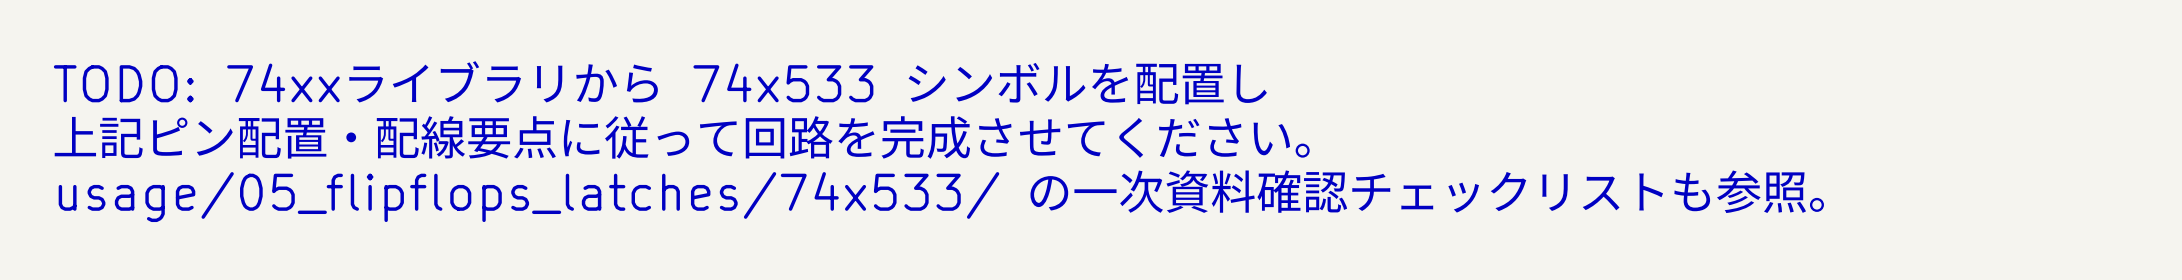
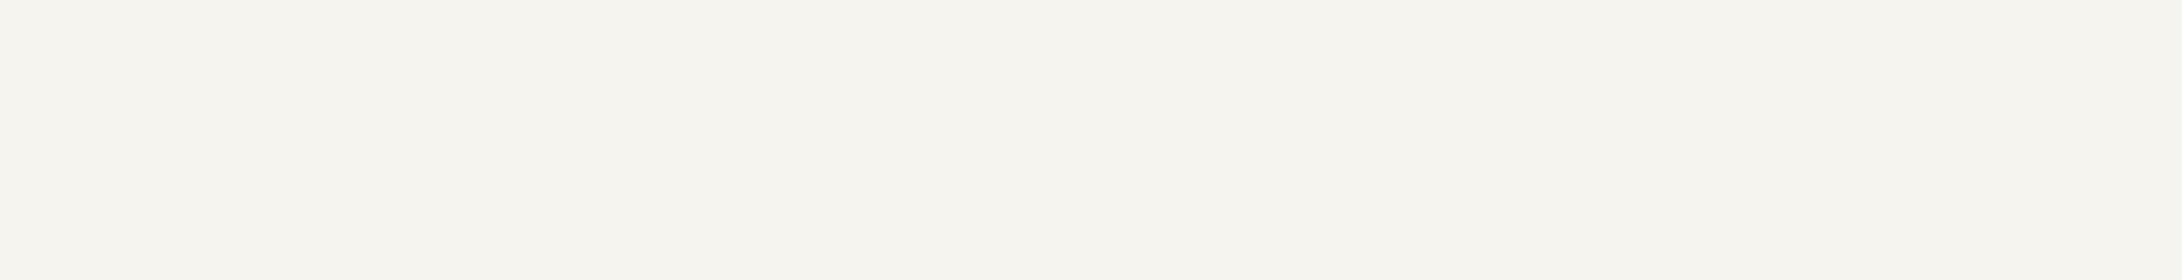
text: TODO: 74xxライブラリから 74x533 シンボルを配置し (661, 82) -> none
text: 上記ピン配置・配線要点に従って回路を完成させてください。 (682, 137) -> none
text: usage/05_flipflops_latches/74x533/ の一次資料確認チェックリストも参照。 (942, 195) -> none

